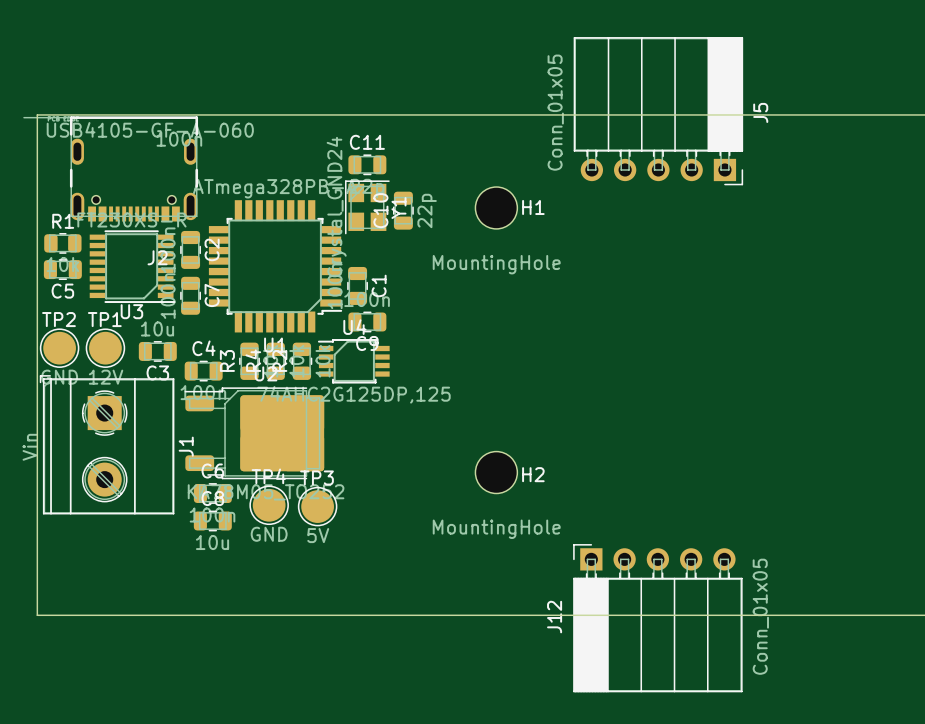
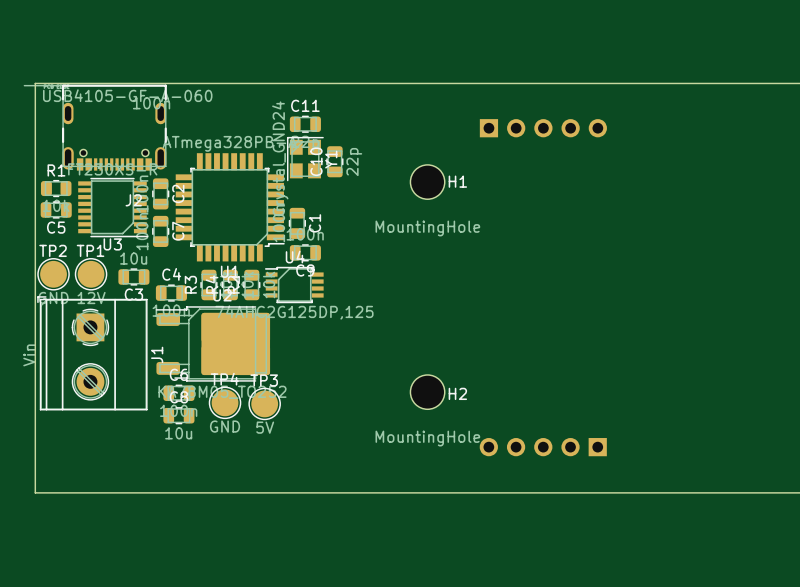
J5 side: top (658, 111) -> bottom (543, 128)
H1 position: (496, 207) -> (427, 182)
H2 position: (496, 472) -> (427, 392)
J12 side: top (657, 618) -> bottom (543, 447)

